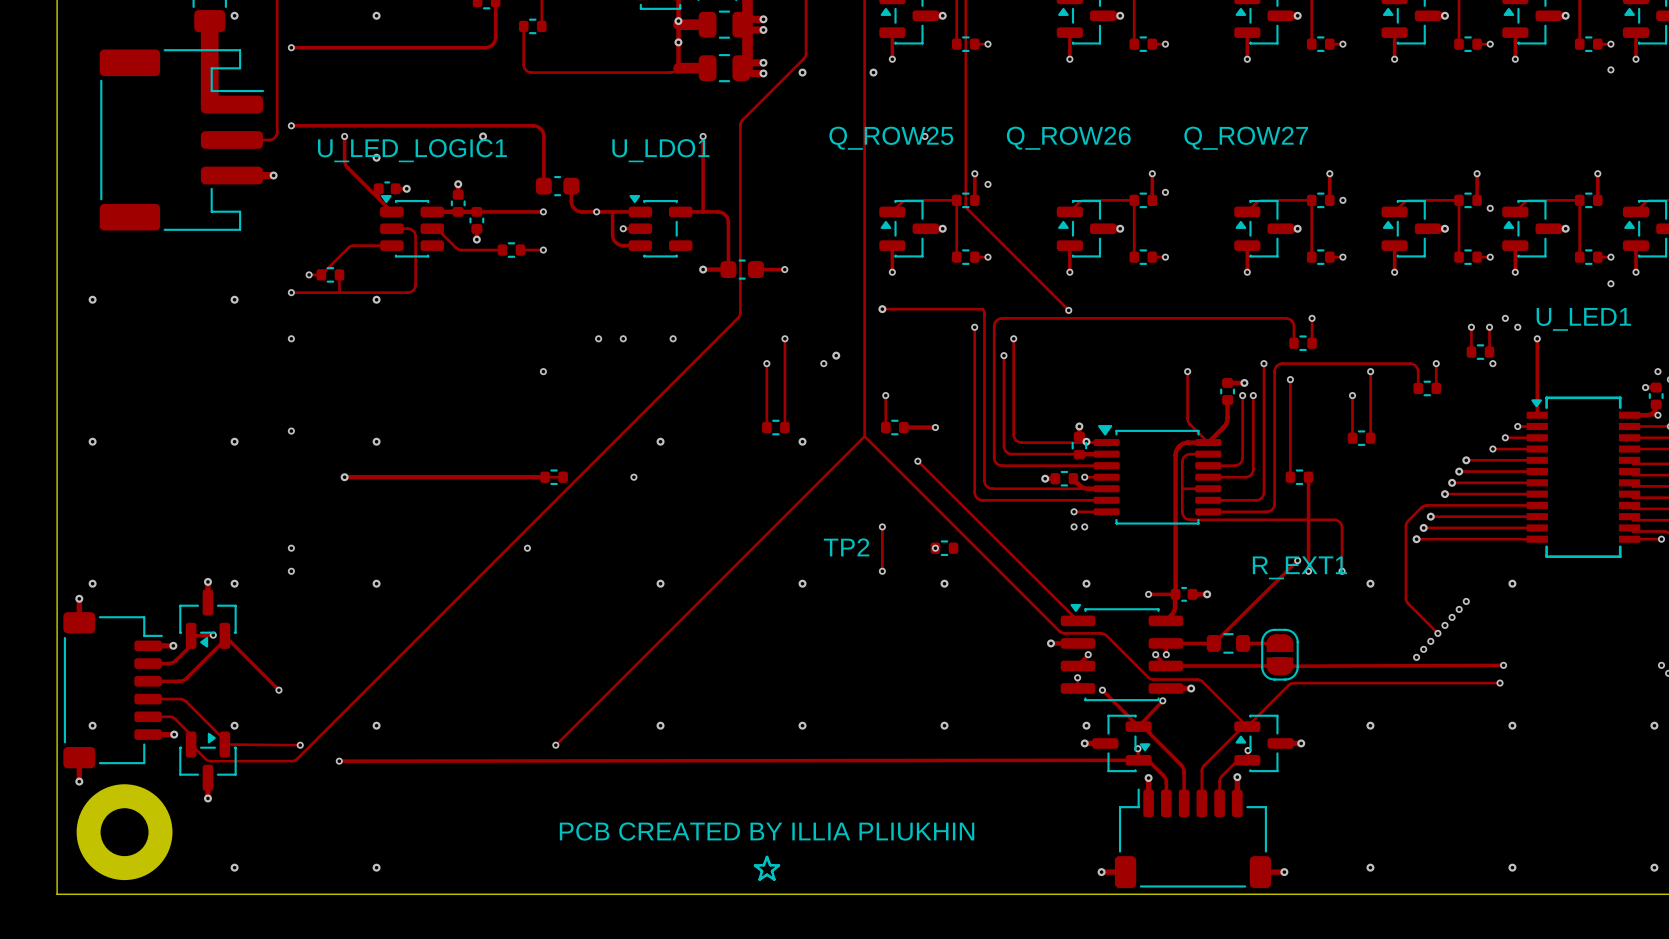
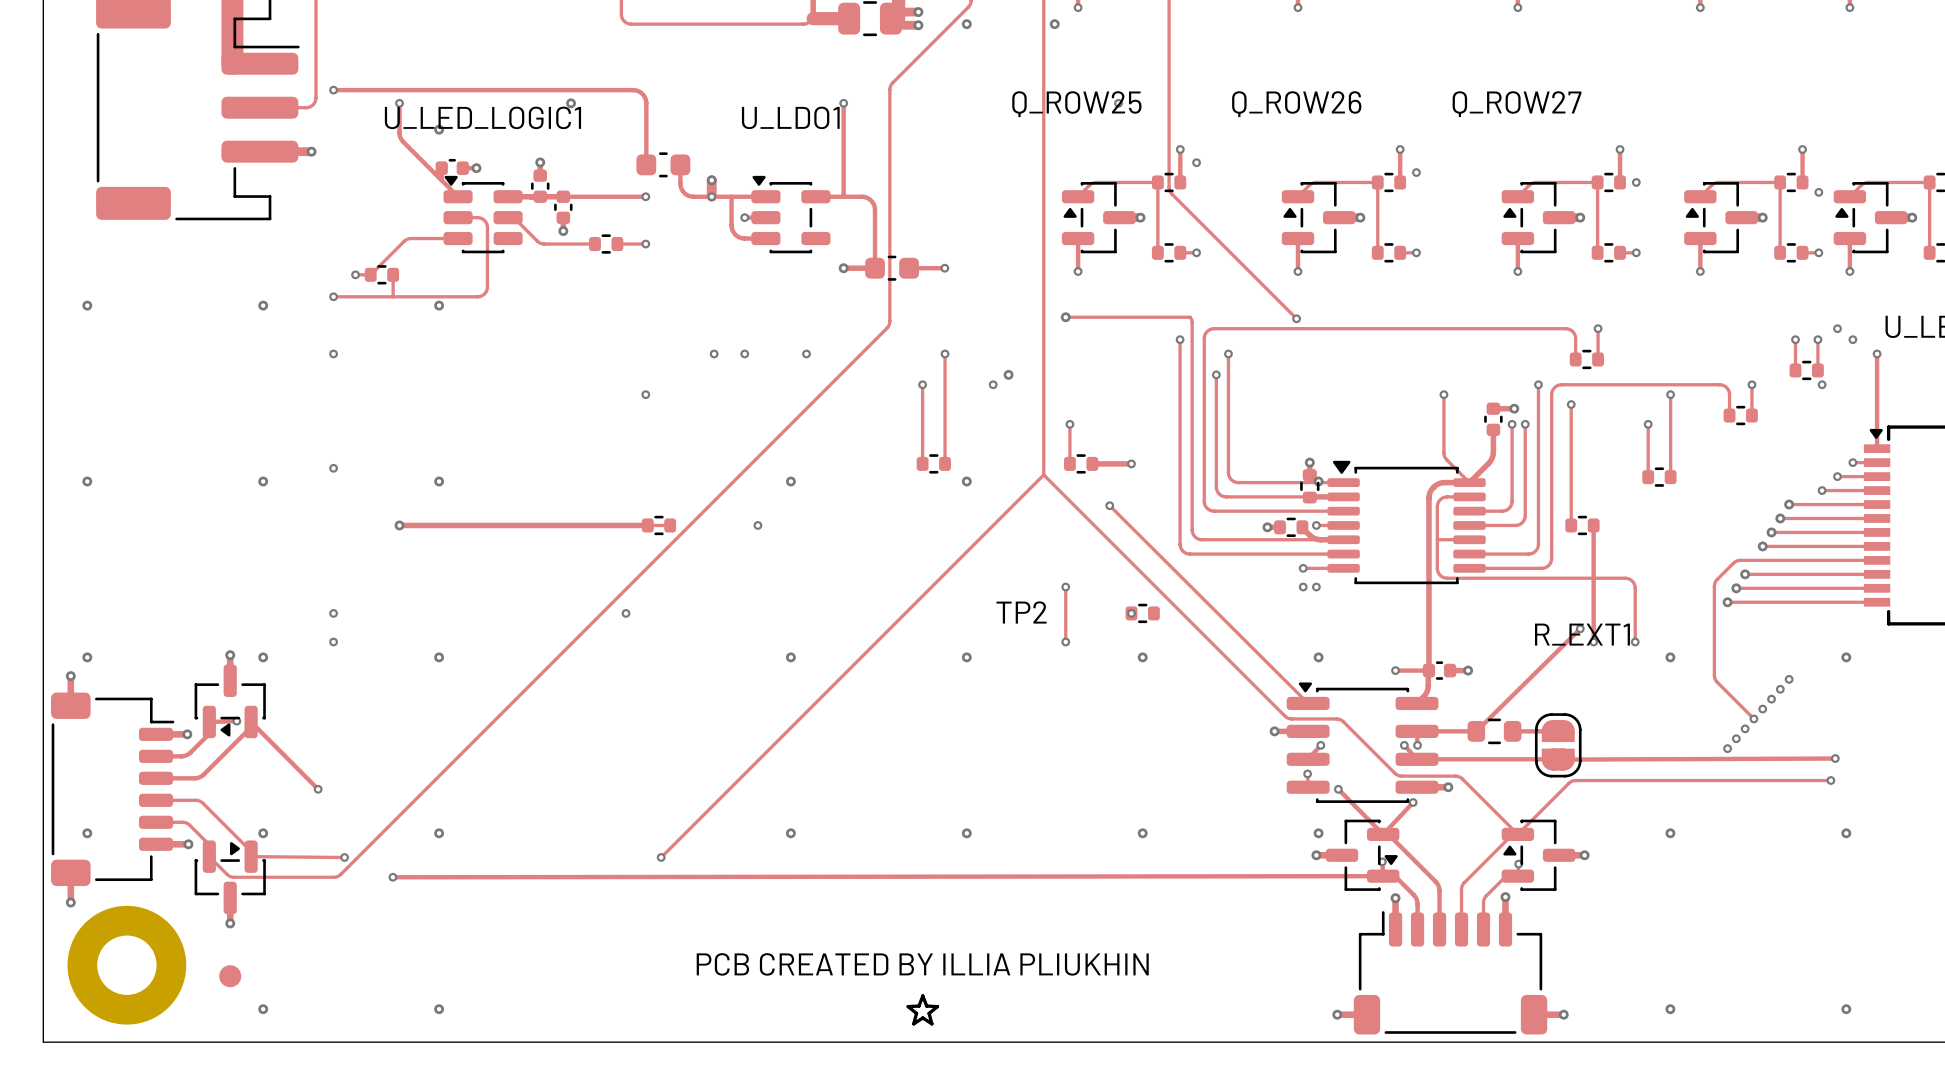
track: none -> (711, 180) (711, 196)
via: none -> (711, 180)
part: none -> (230, 976)

